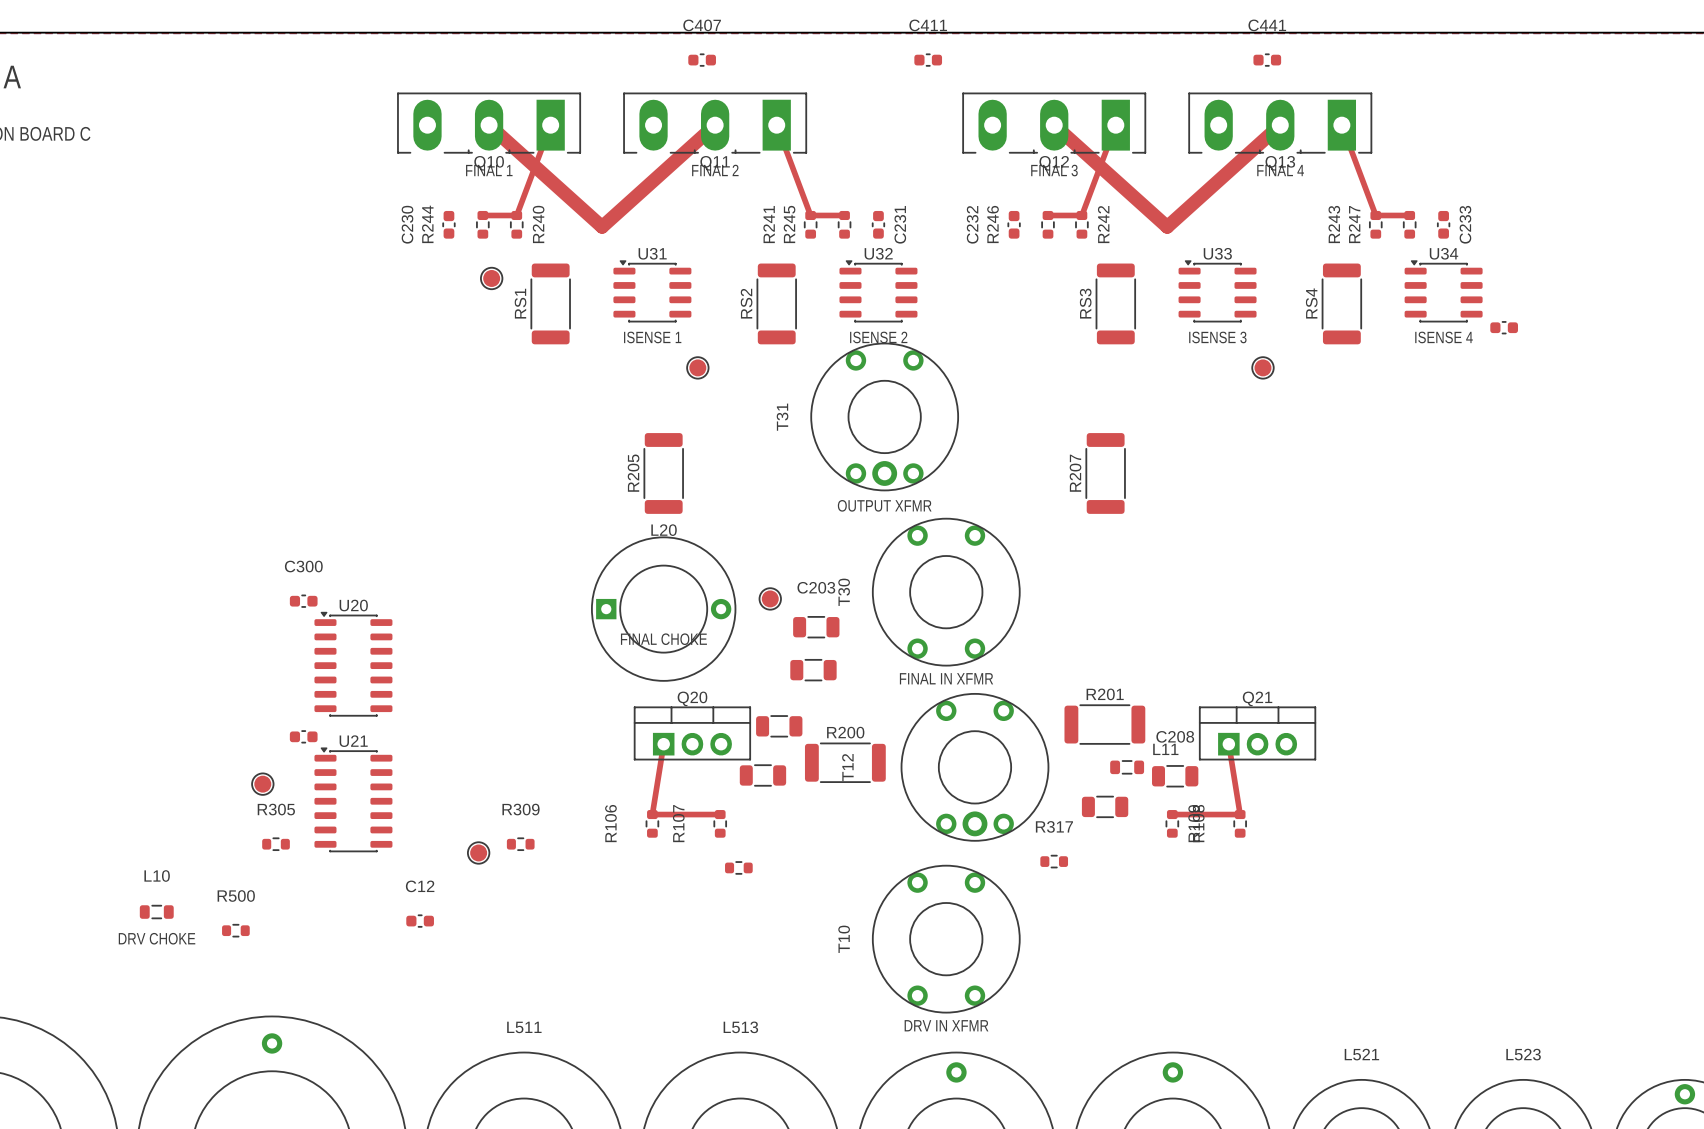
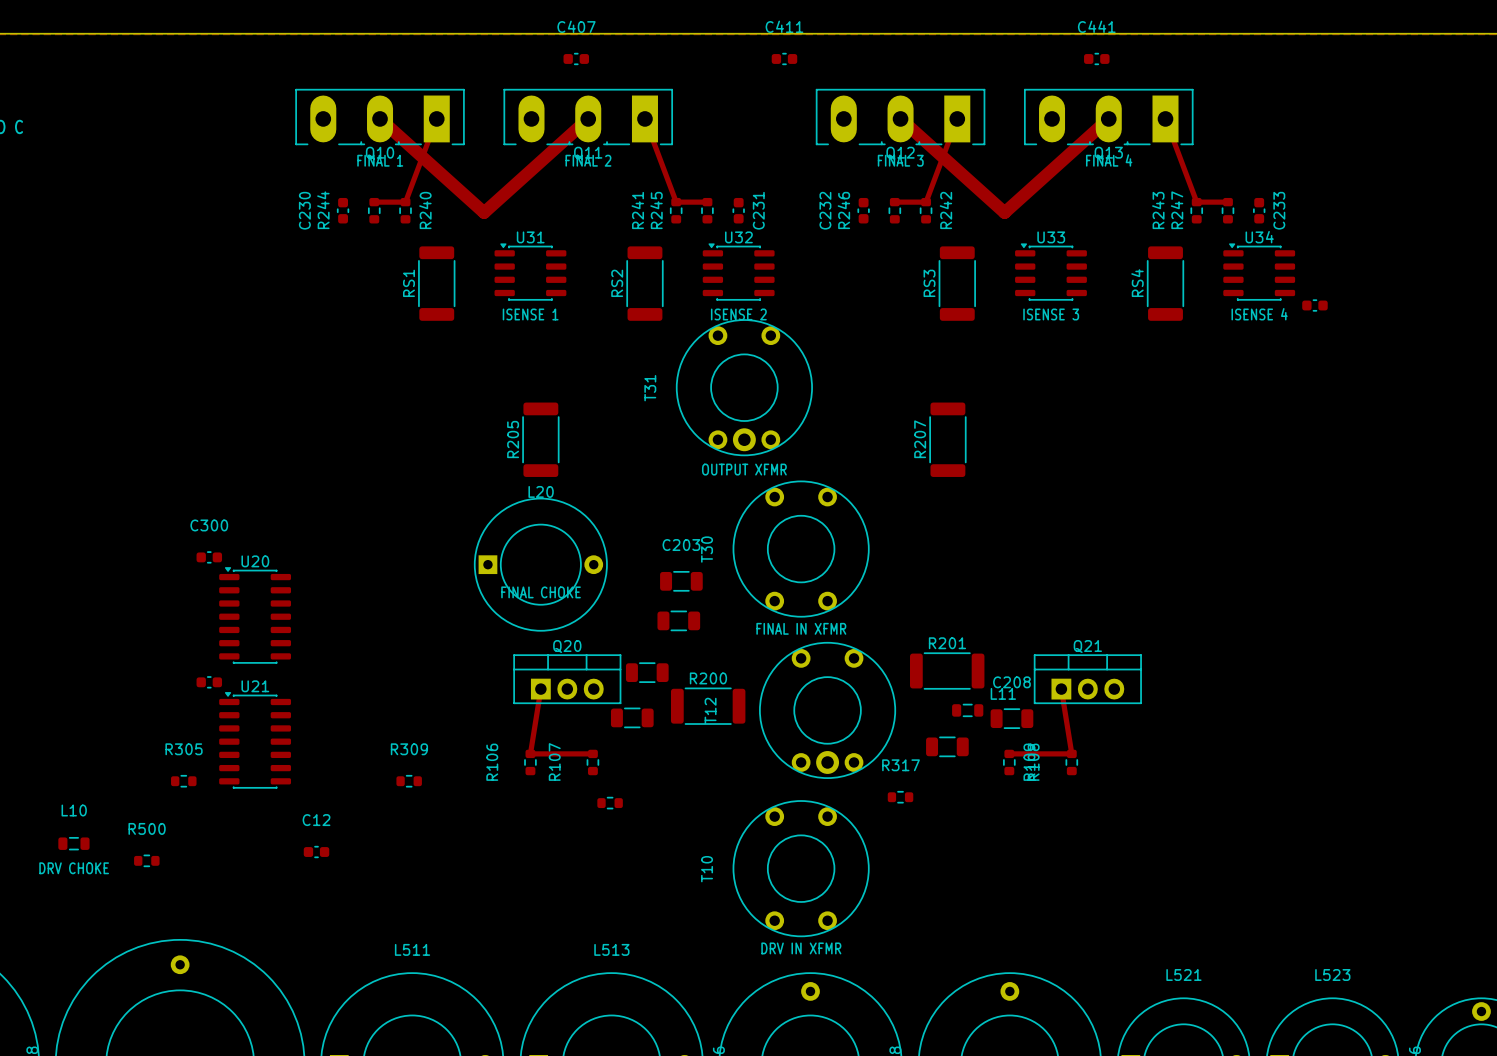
part: (491, 278) -> none
part: (697, 367) -> none
part: (1262, 367) -> none
part: (770, 598) -> none
part: (262, 784) -> none
part: (478, 852) -> none

